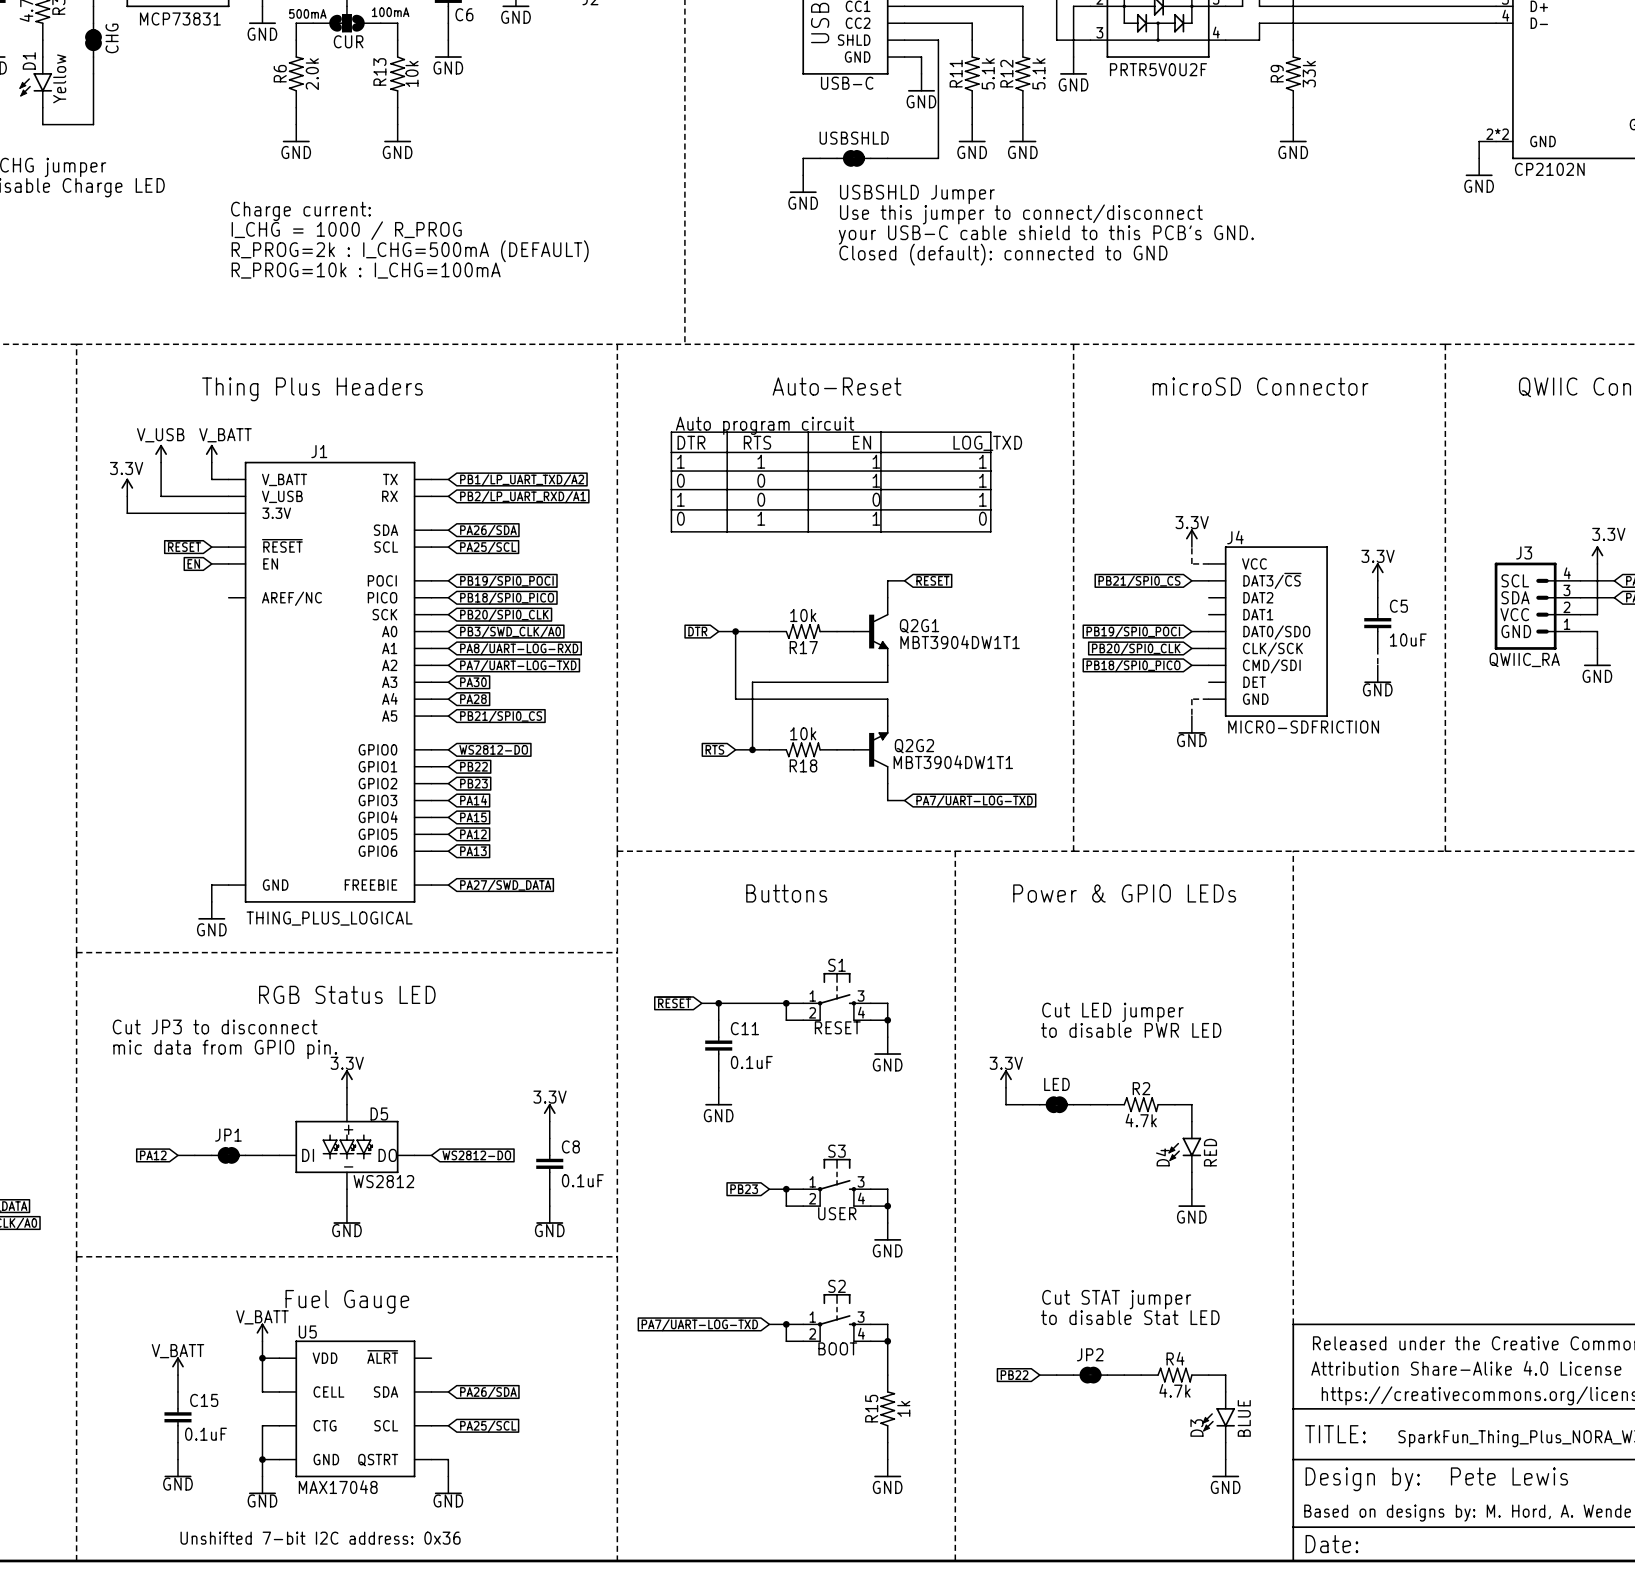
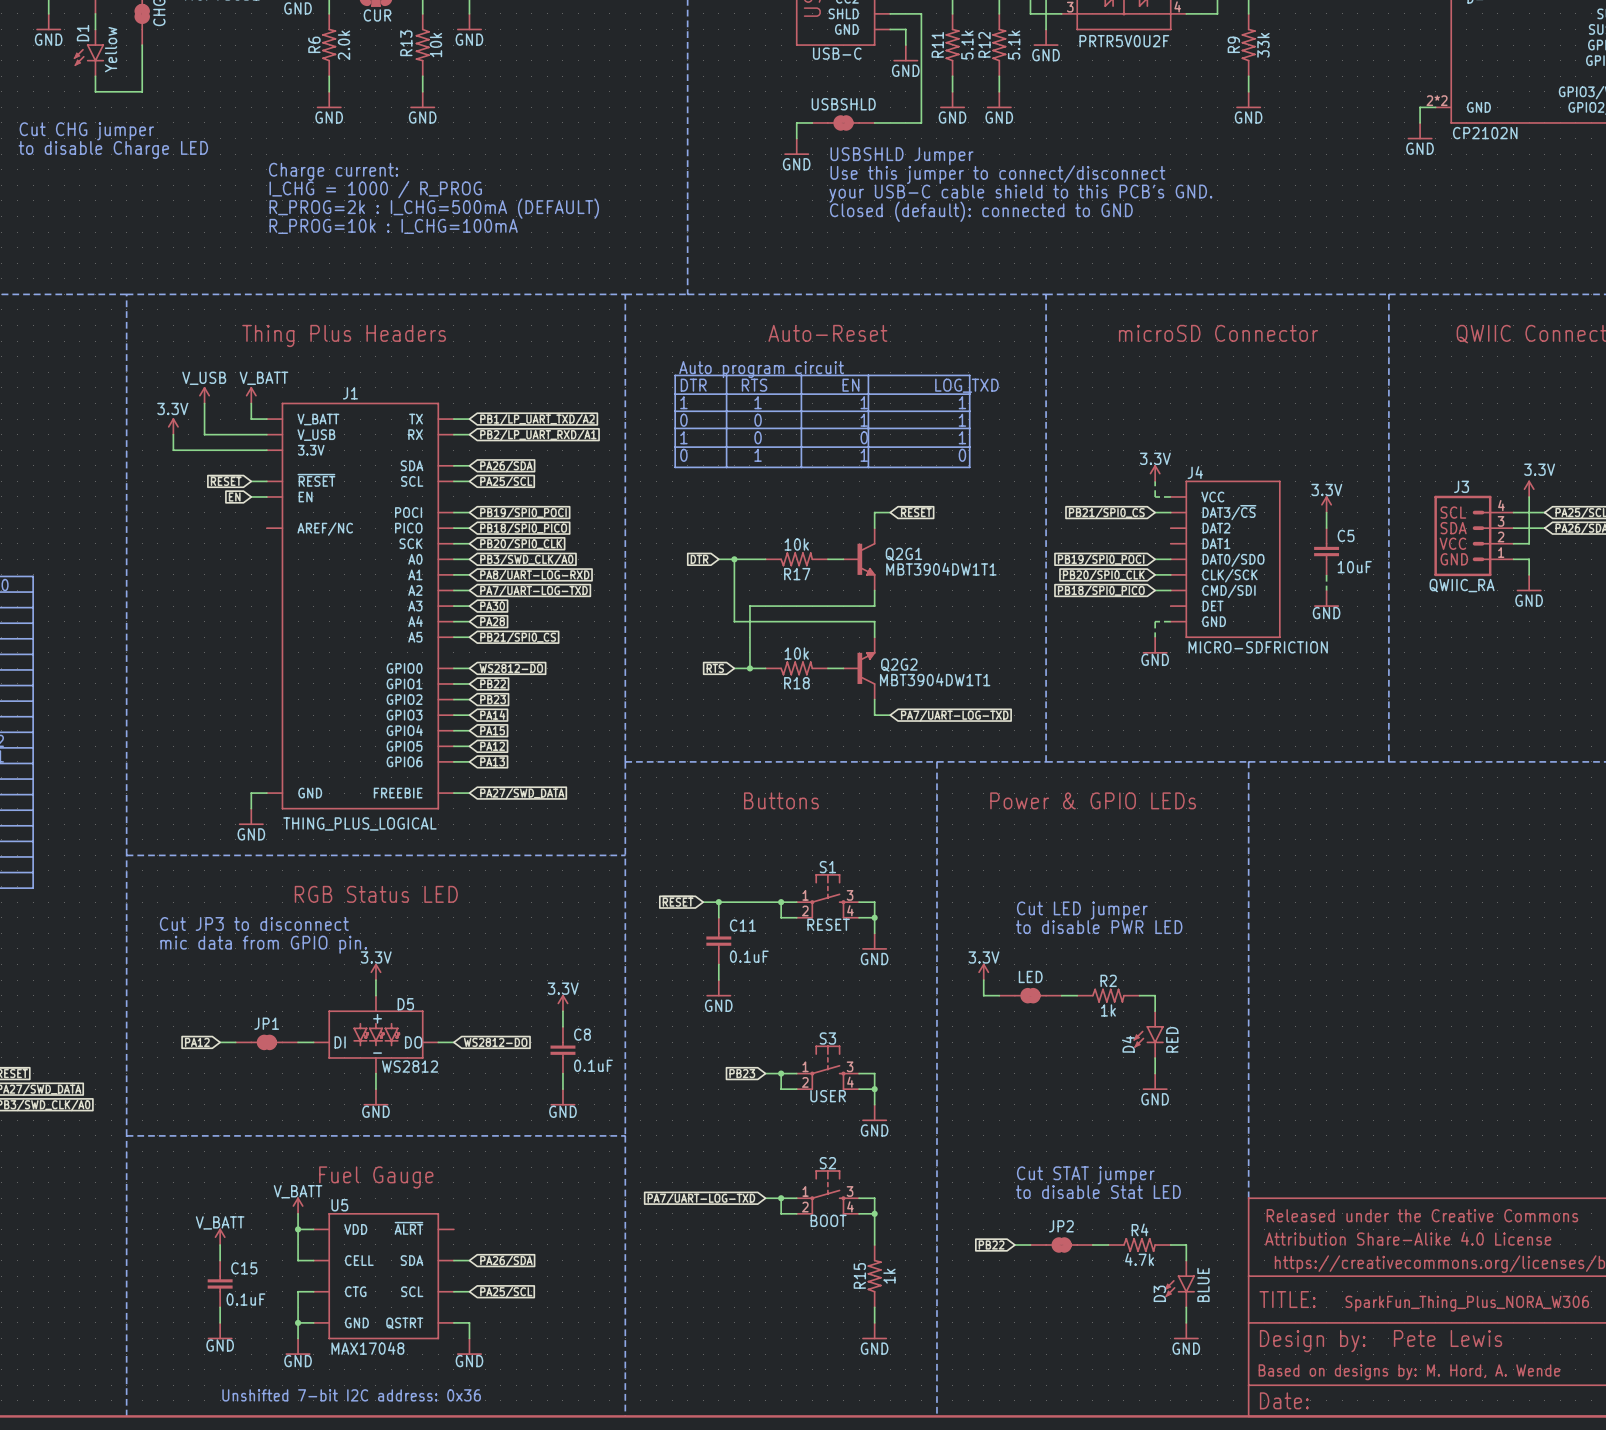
R2 value: 4.7k (1141, 1120) -> 1k (1108, 1010)

